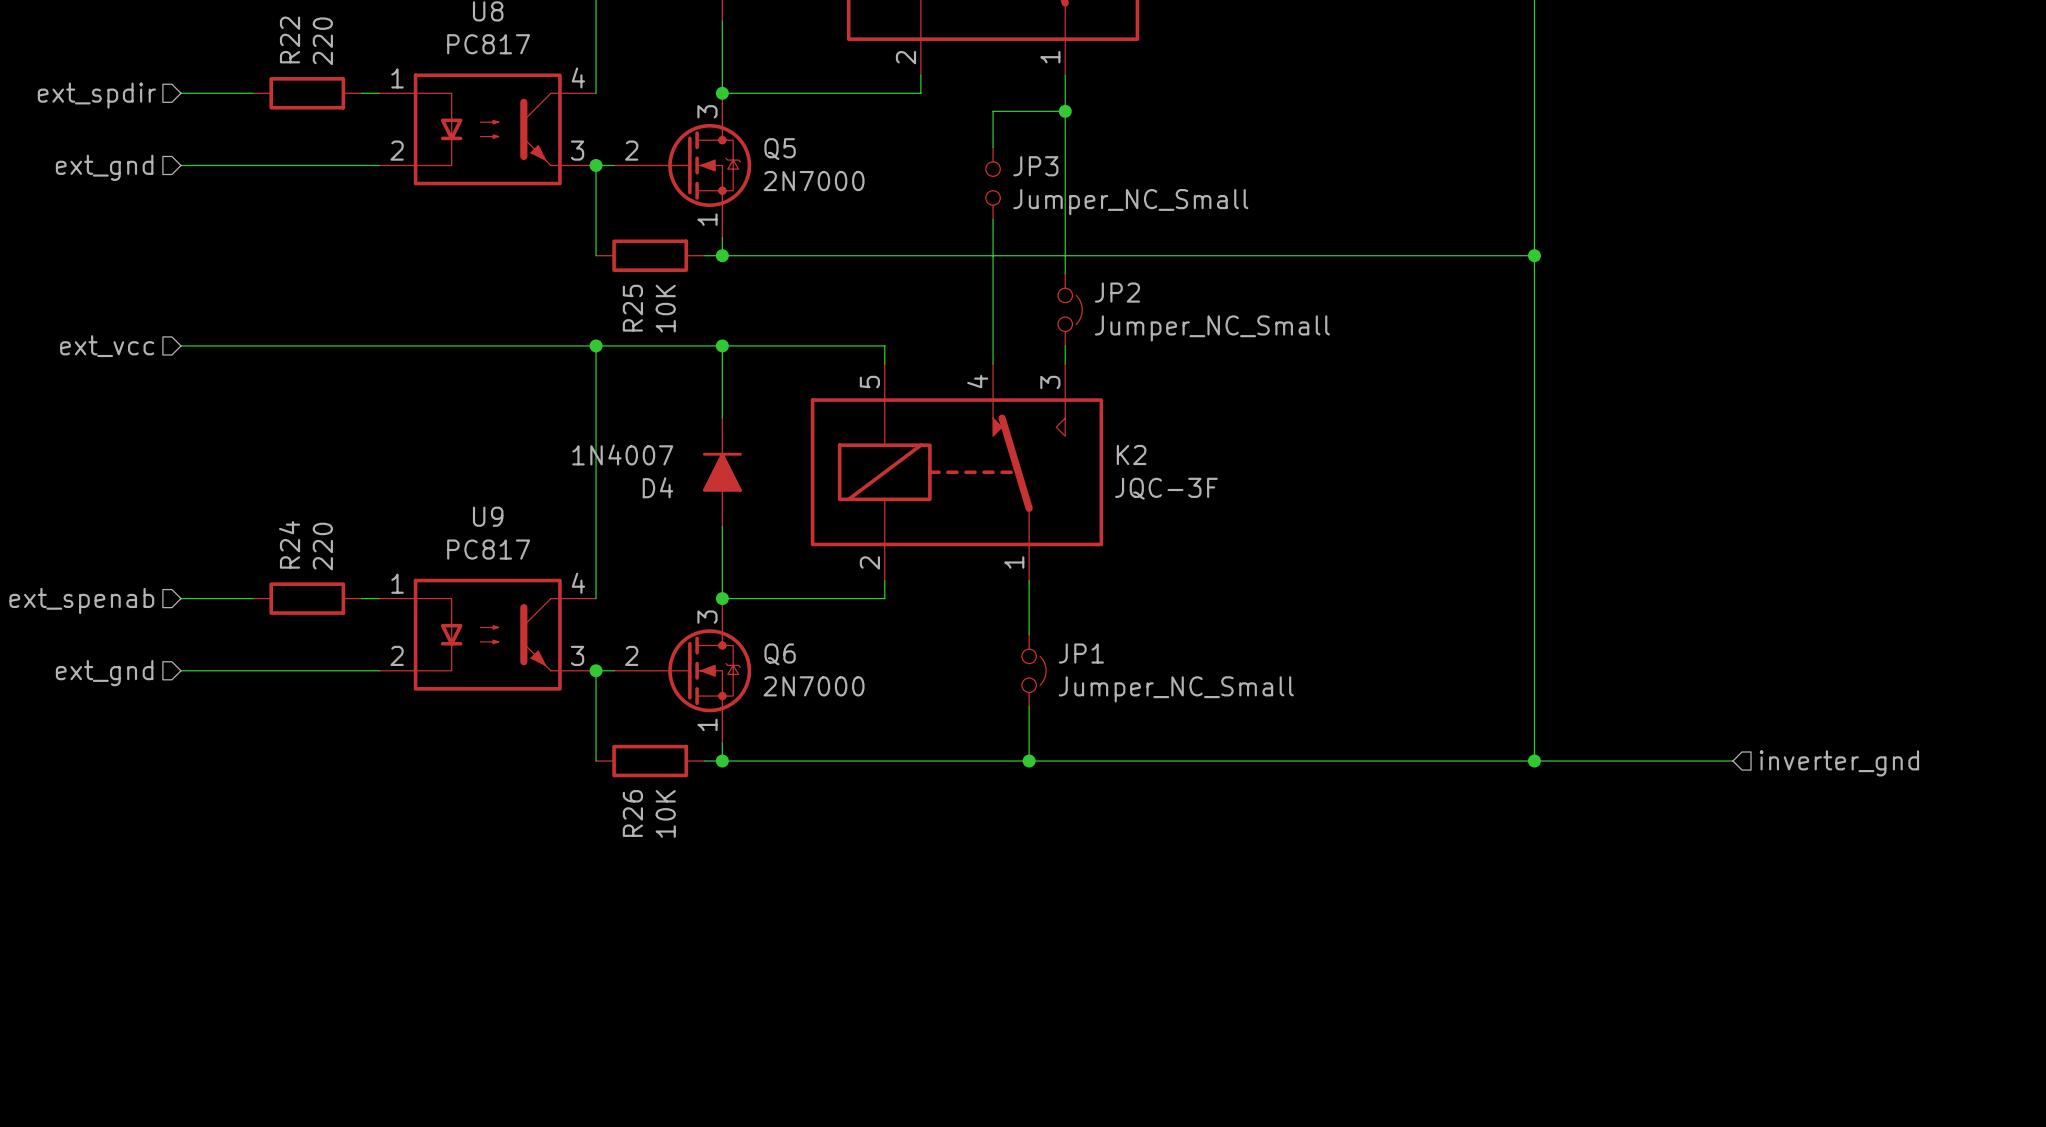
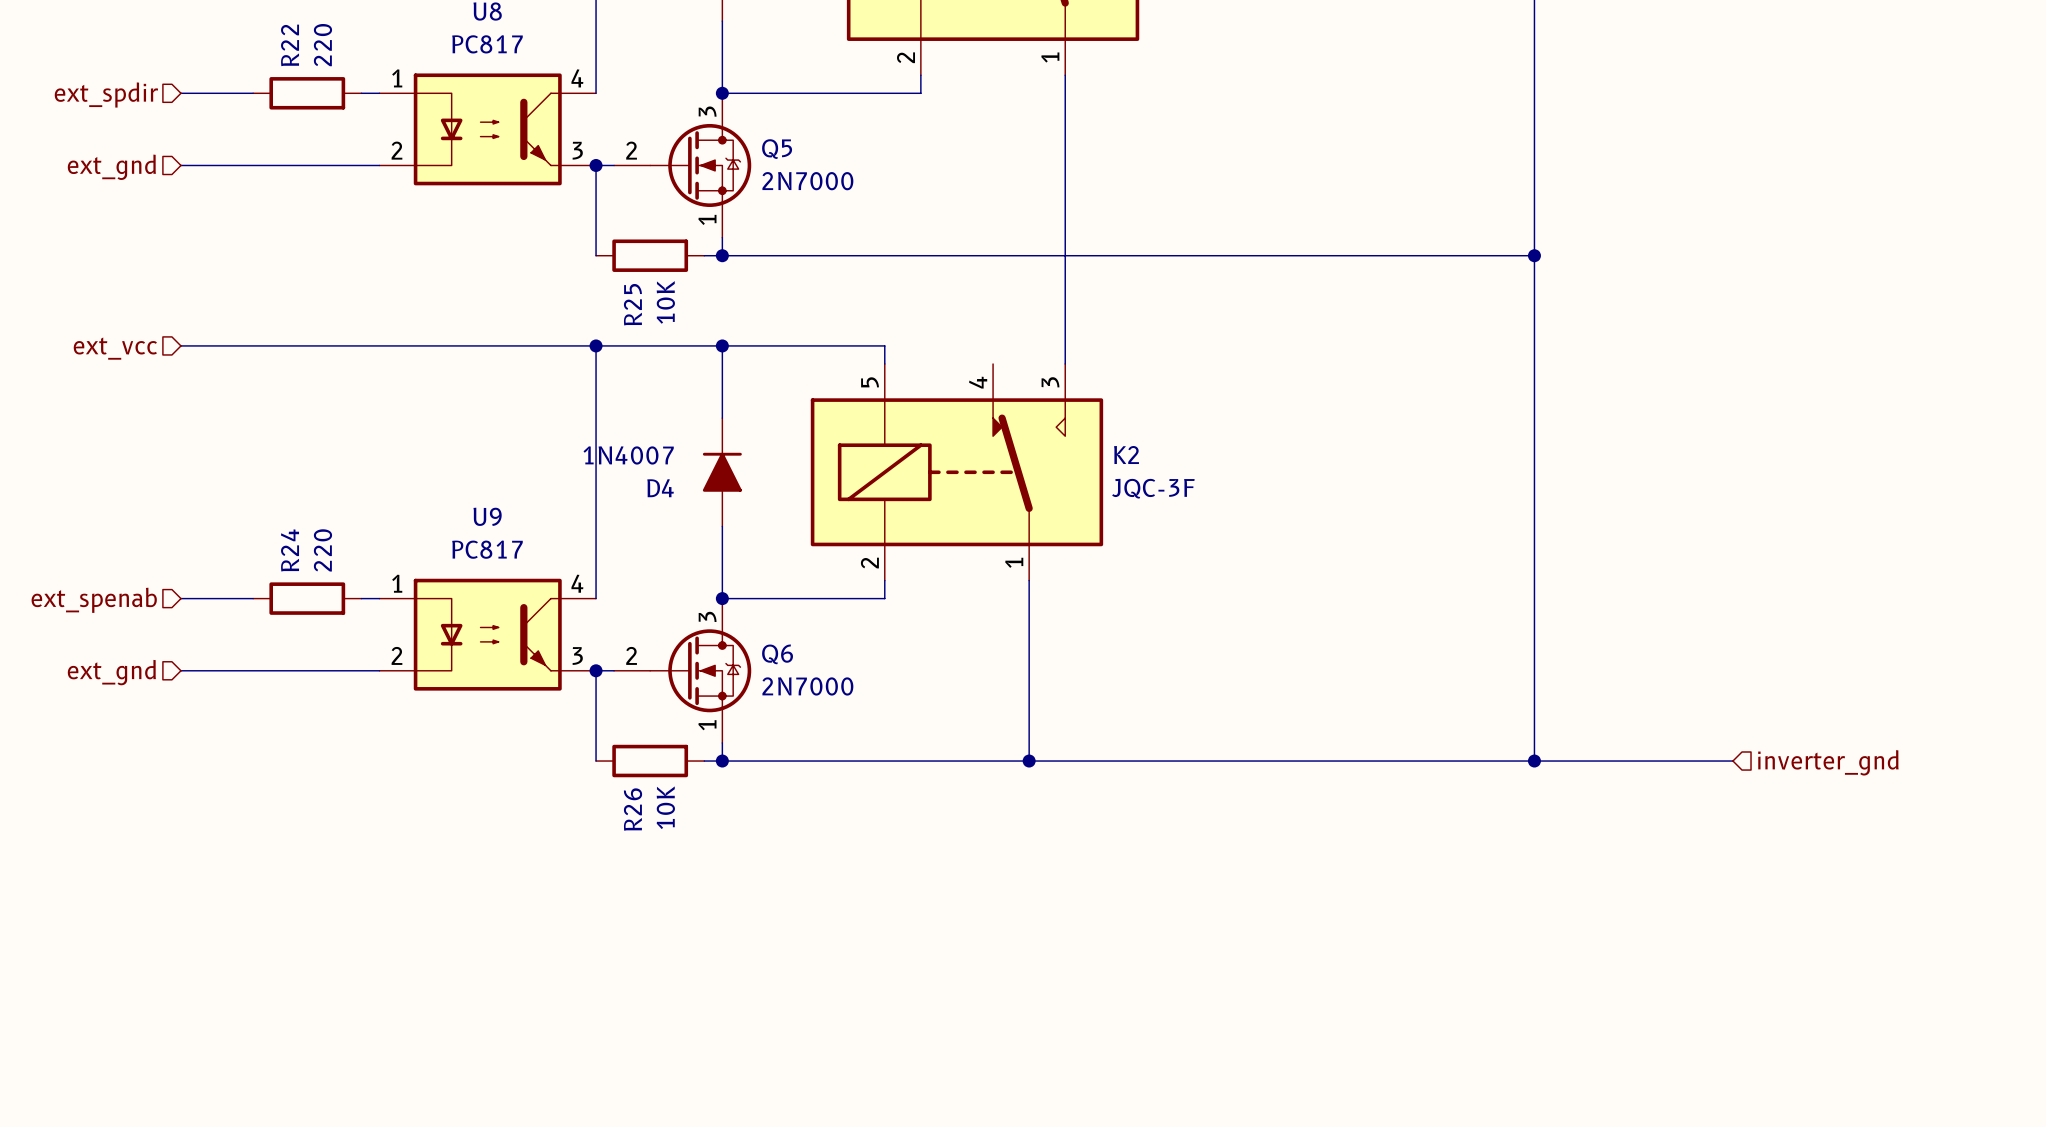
wire: (1065, 111) (993, 111) (993, 147) -> none
junction: (1065, 111) -> none
JP3: Jumper_NC_Small (993, 183) -> none
wire: (993, 219) (993, 363) -> none
wire: none -> (1065, 273) (1065, 345)
JP2: Jumper_NC_Small (1070, 309) -> none
wire: none -> (1029, 634) (1029, 706)
JP1: Jumper_NC_Small (1034, 670) -> none

